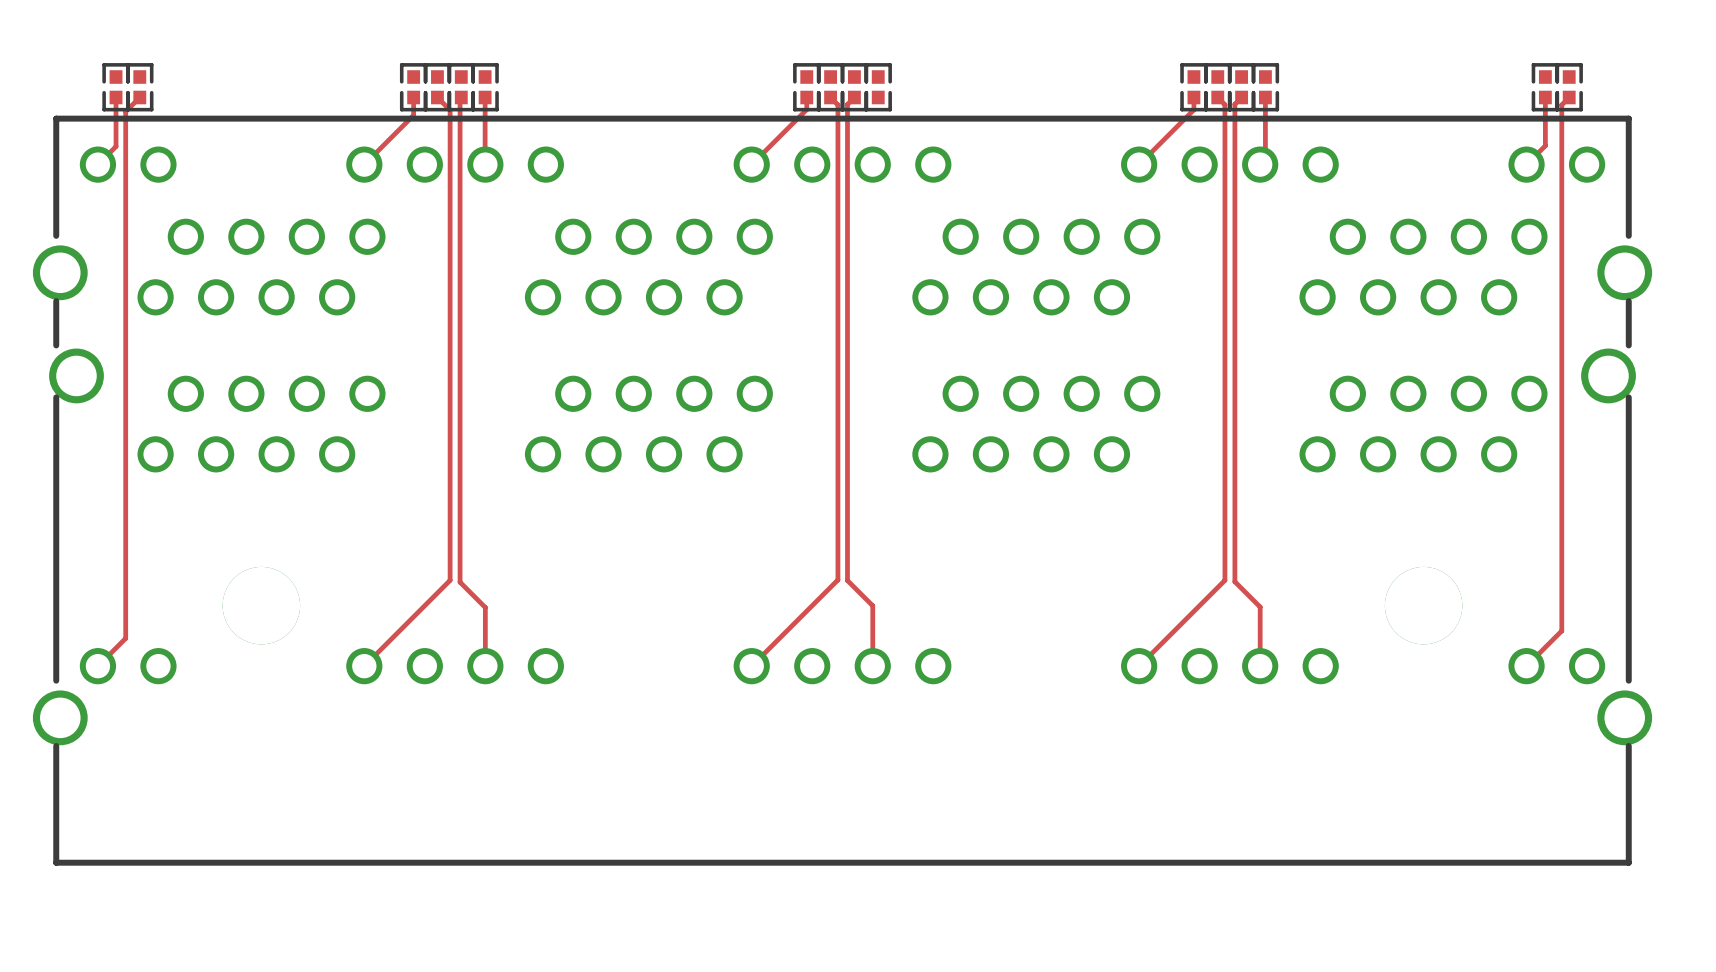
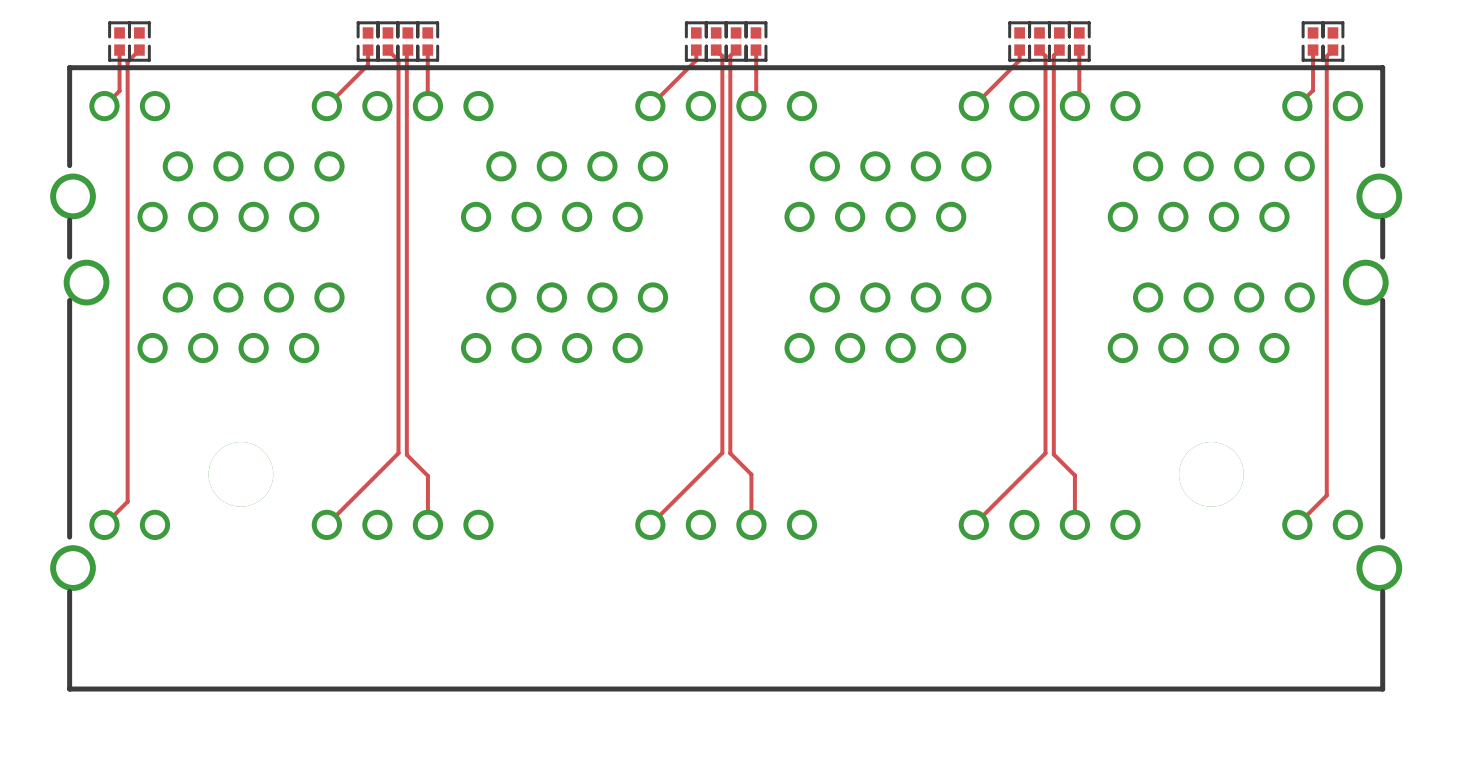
track: none -> (756, 49) (756, 101) (751, 106)

